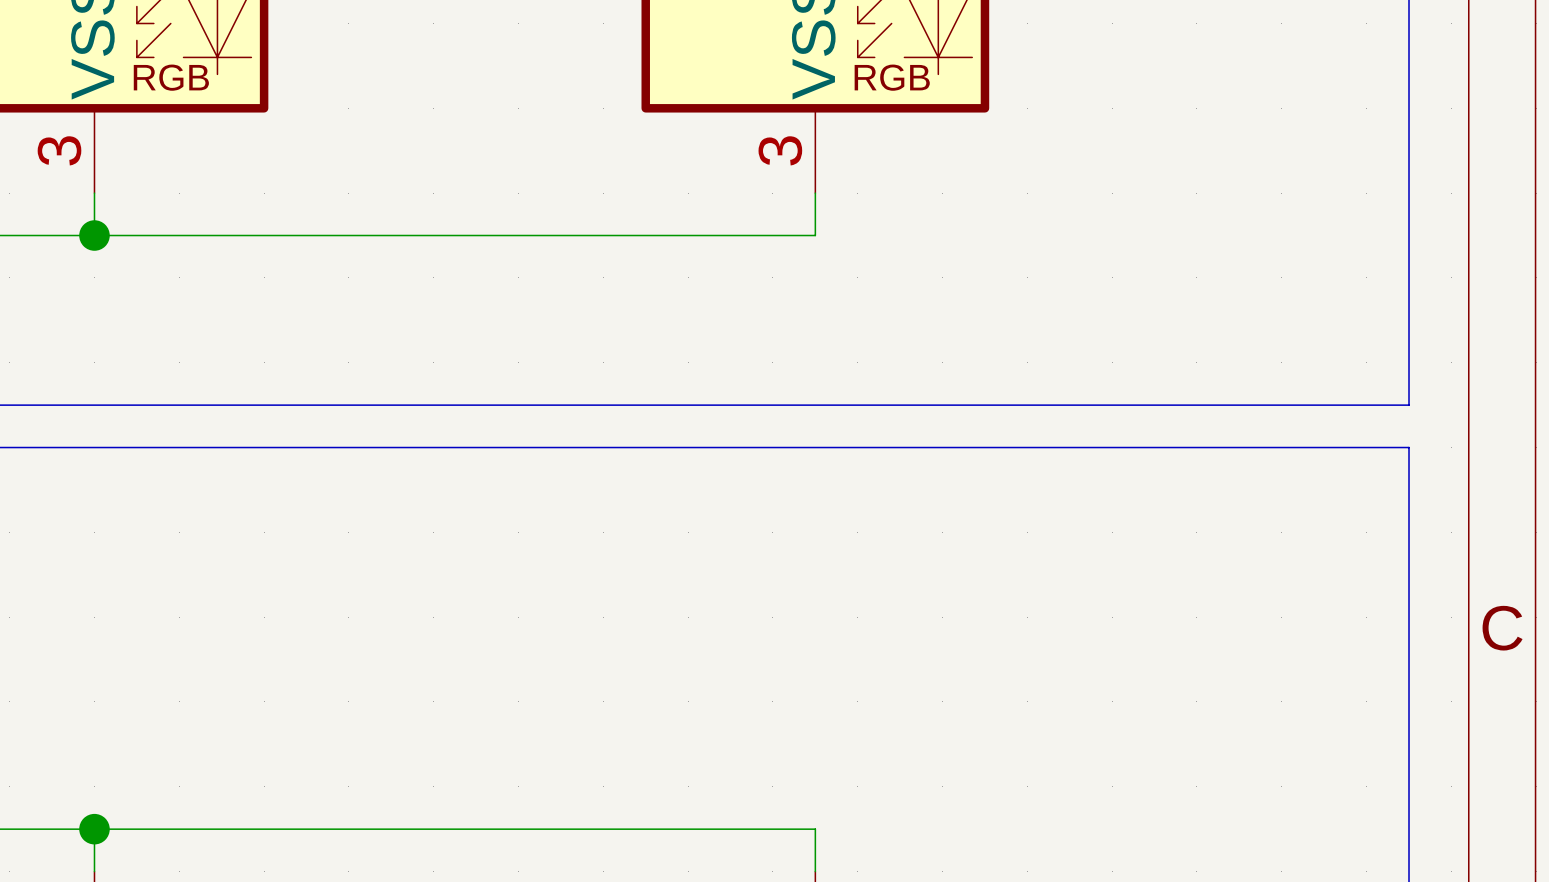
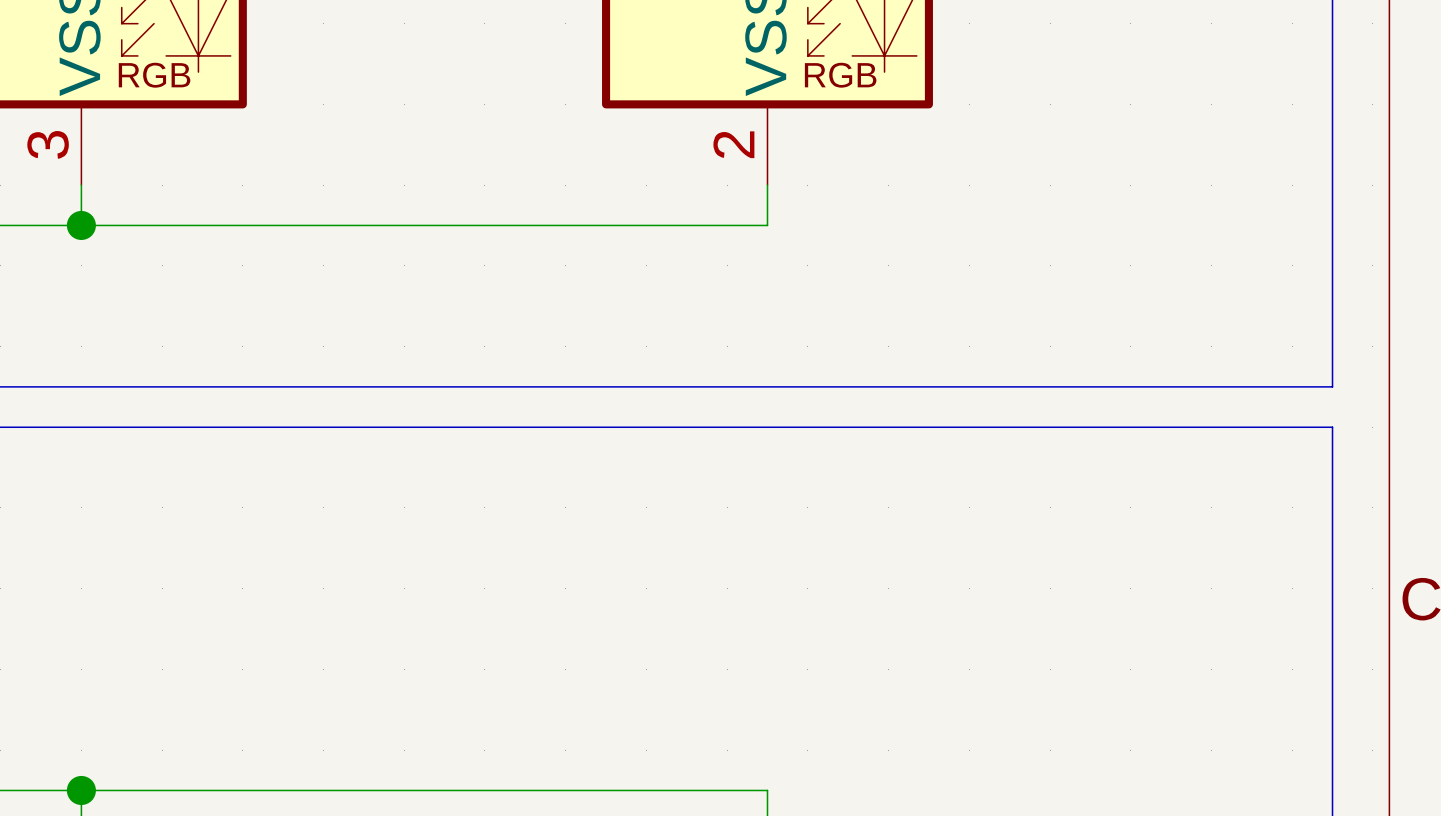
part pin number: 3 (780, 150) -> 2 (733, 144)

